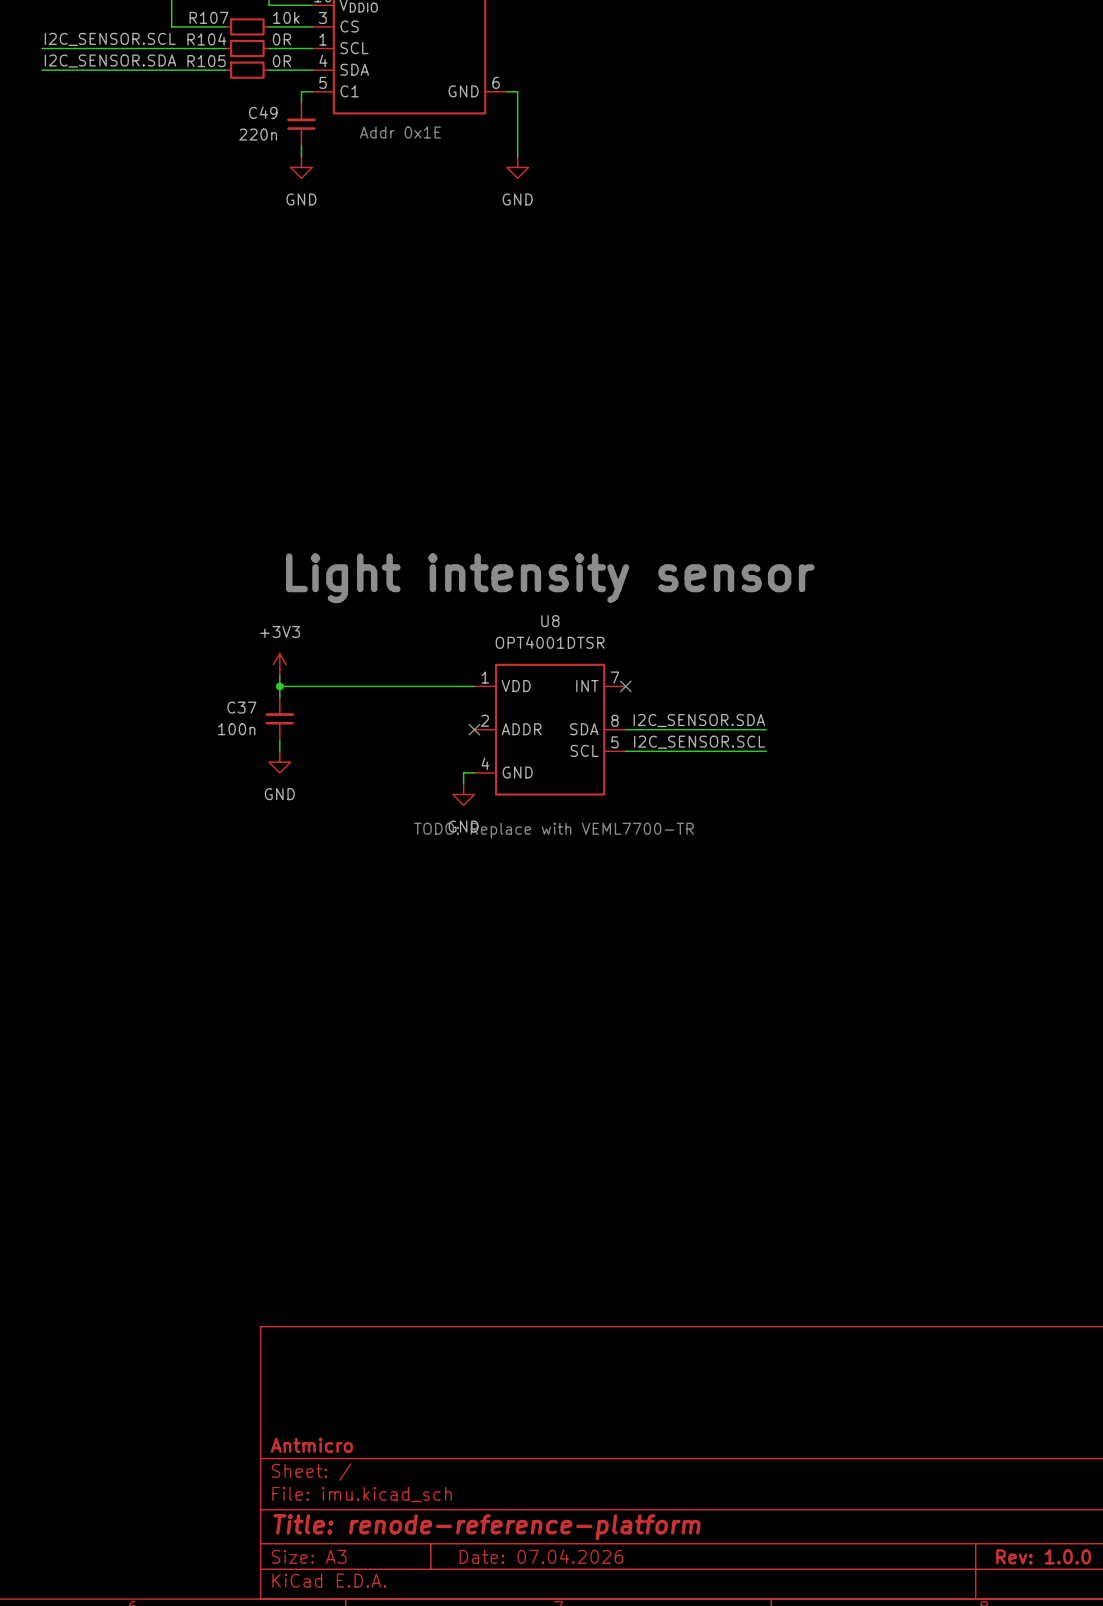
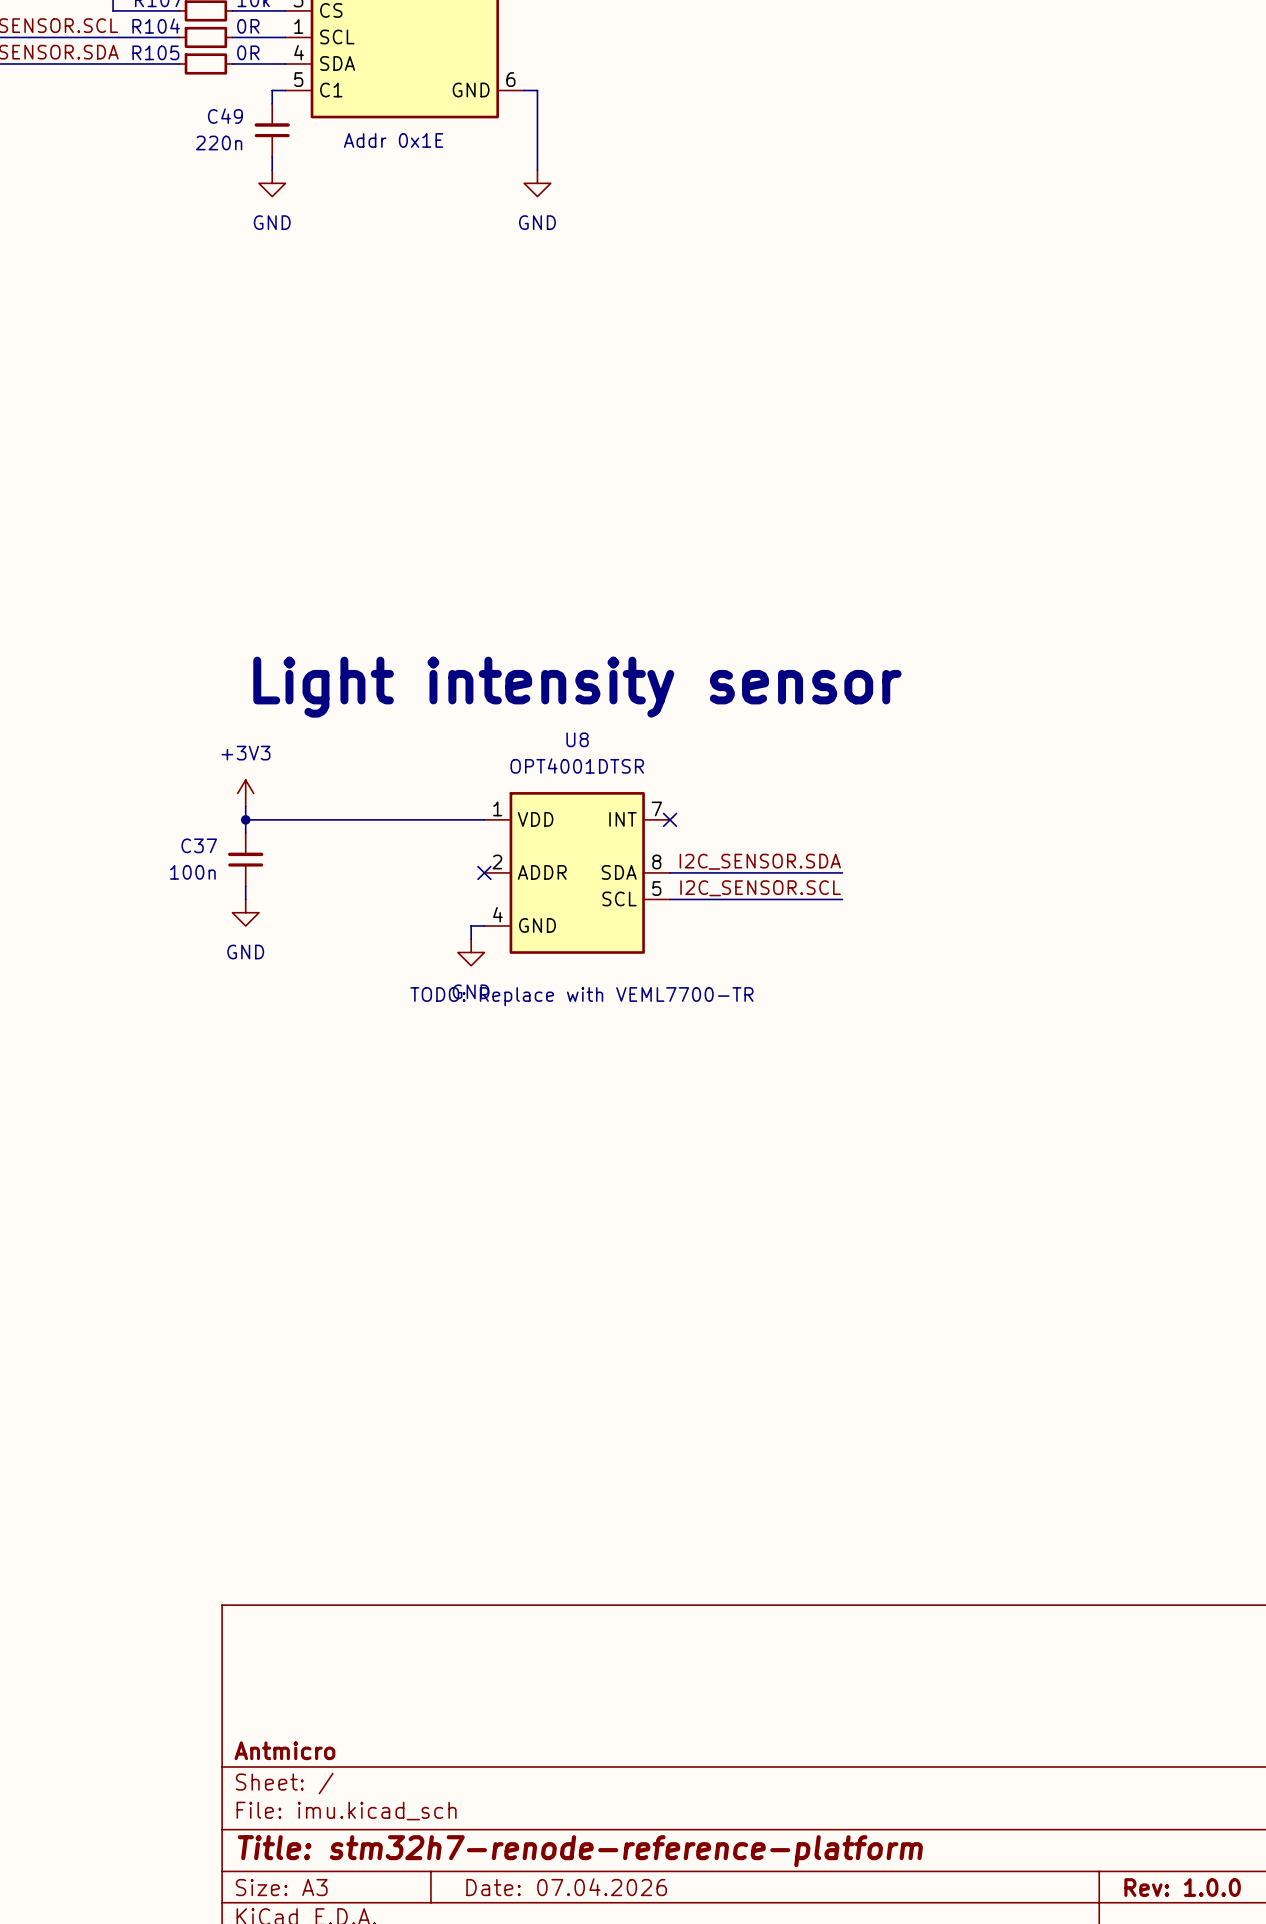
title block: Title: renode-reference-platform (487, 1527) -> Title: stm32h7-renode-reference-platform (580, 1851)

